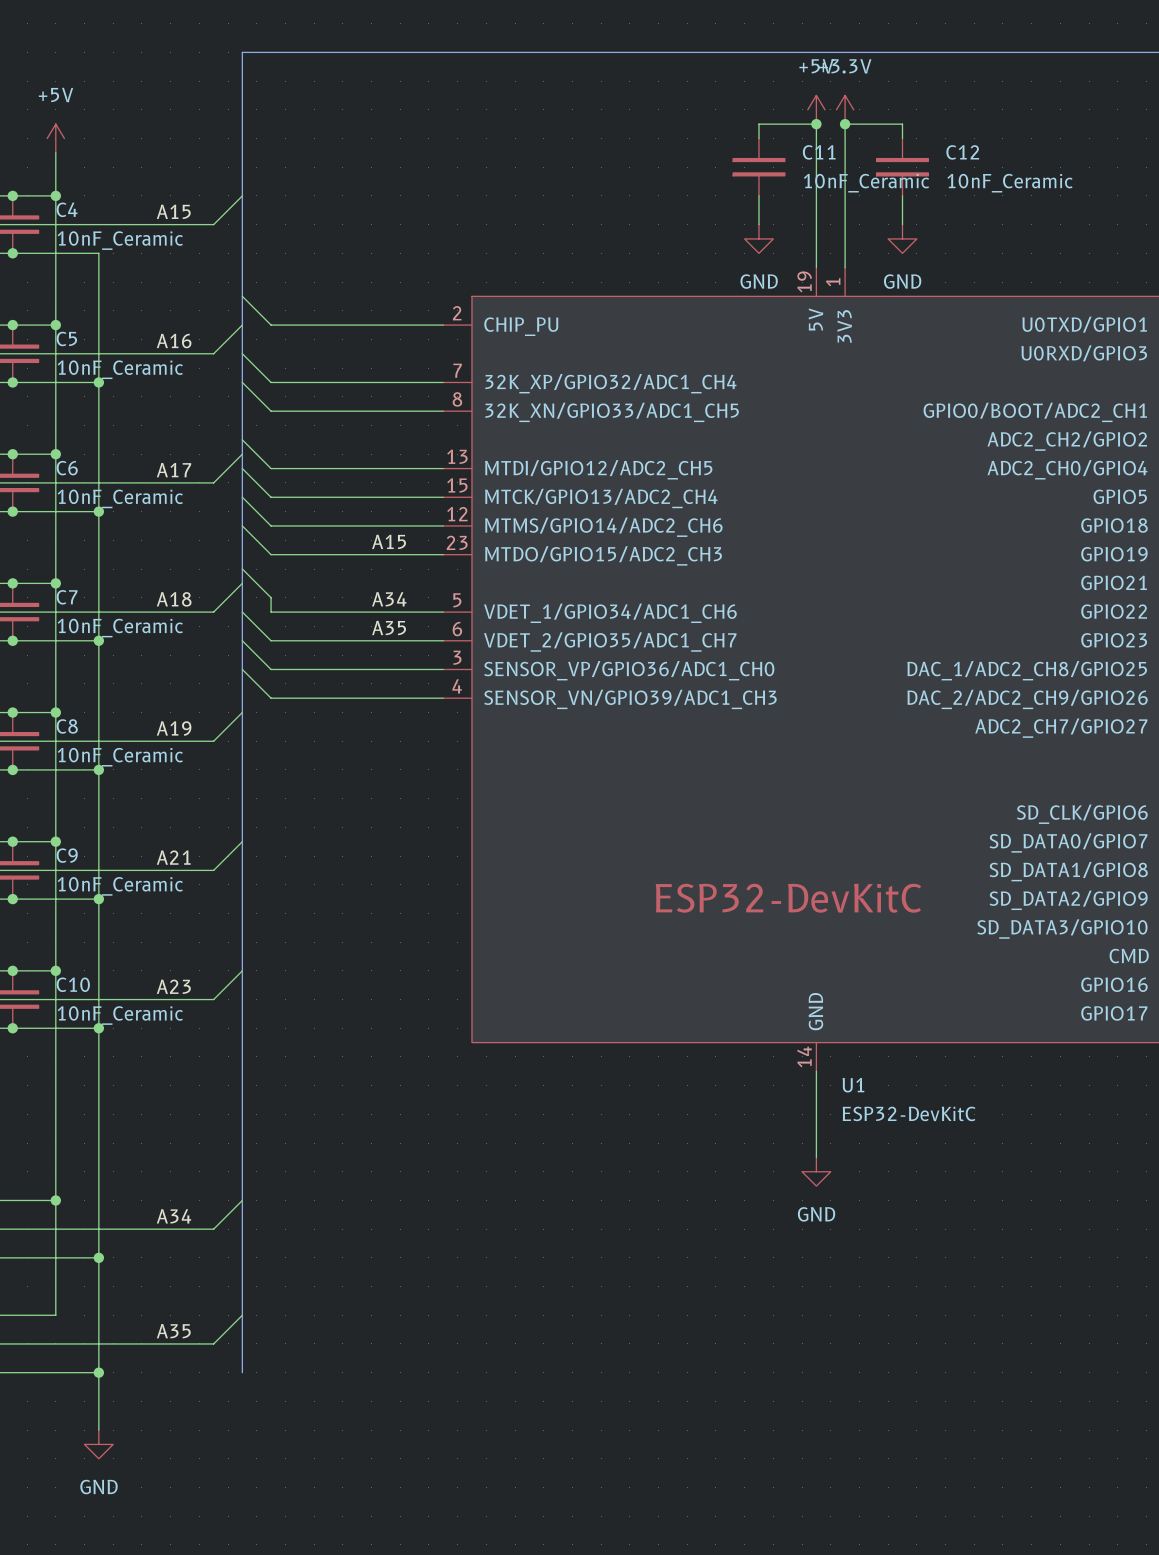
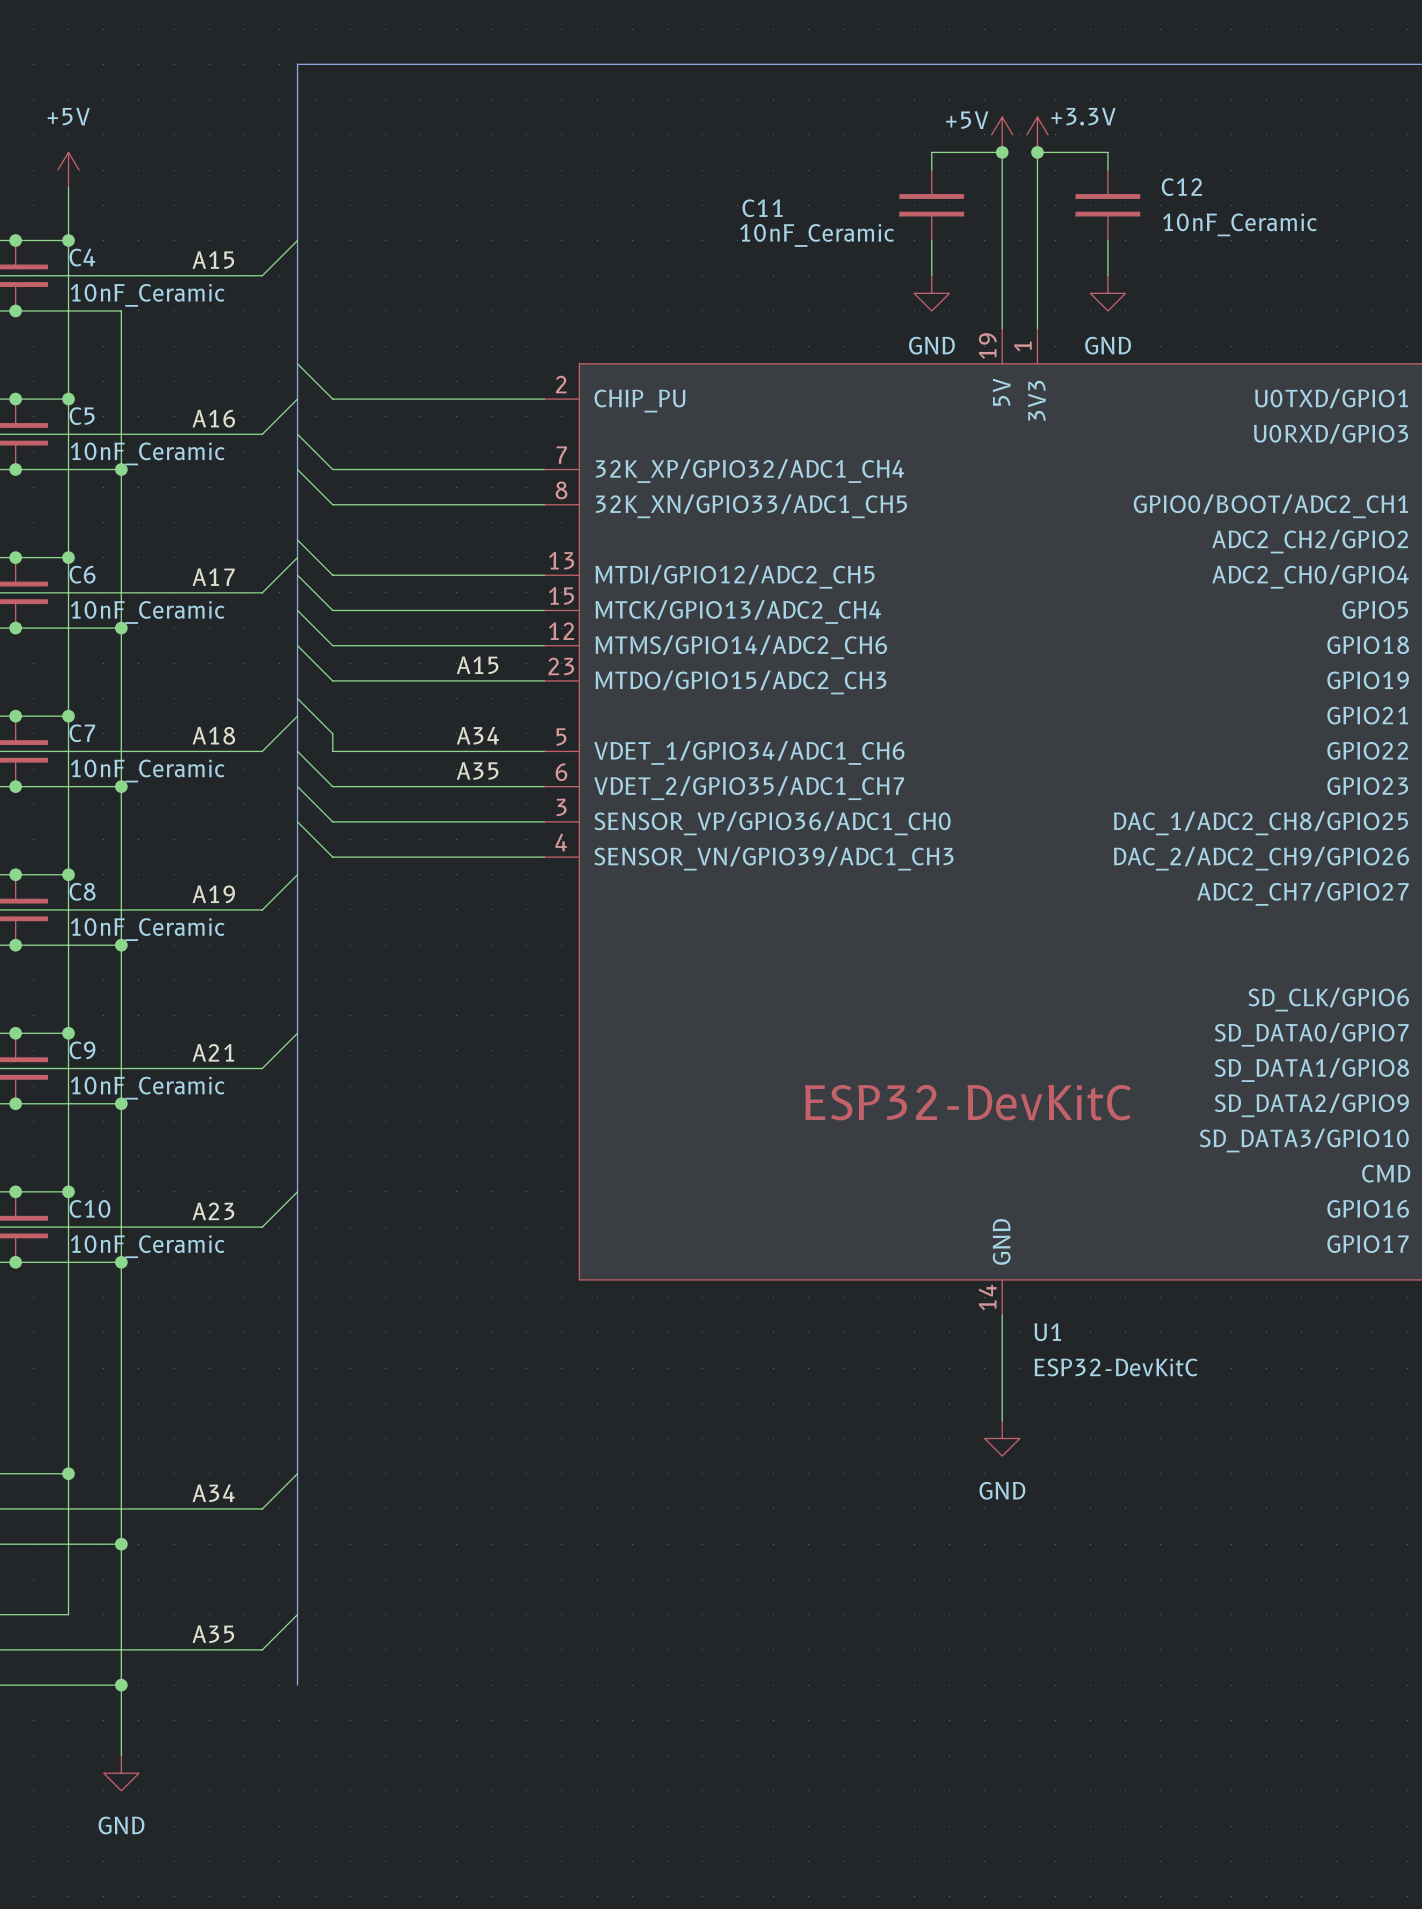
power symbol text position: +5V (816, 66) -> +5V (967, 120)
power symbol text position: +3.3V (845, 66) -> +3.3V (1083, 116)
C11 name position: C11 (819, 152) -> C11 (762, 208)
C11 value position: 10nF_Ceramic (866, 183) -> 10nF_Ceramic (817, 235)

